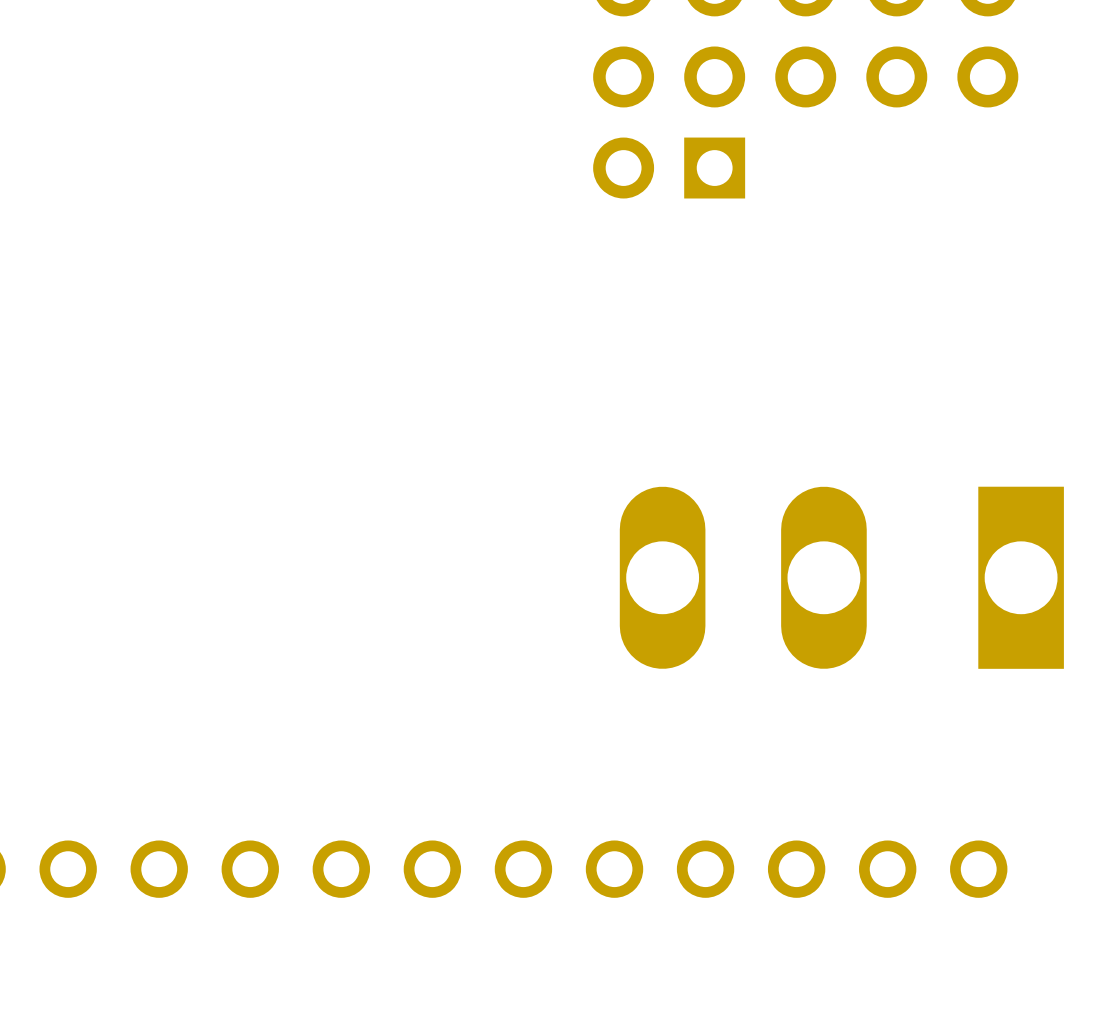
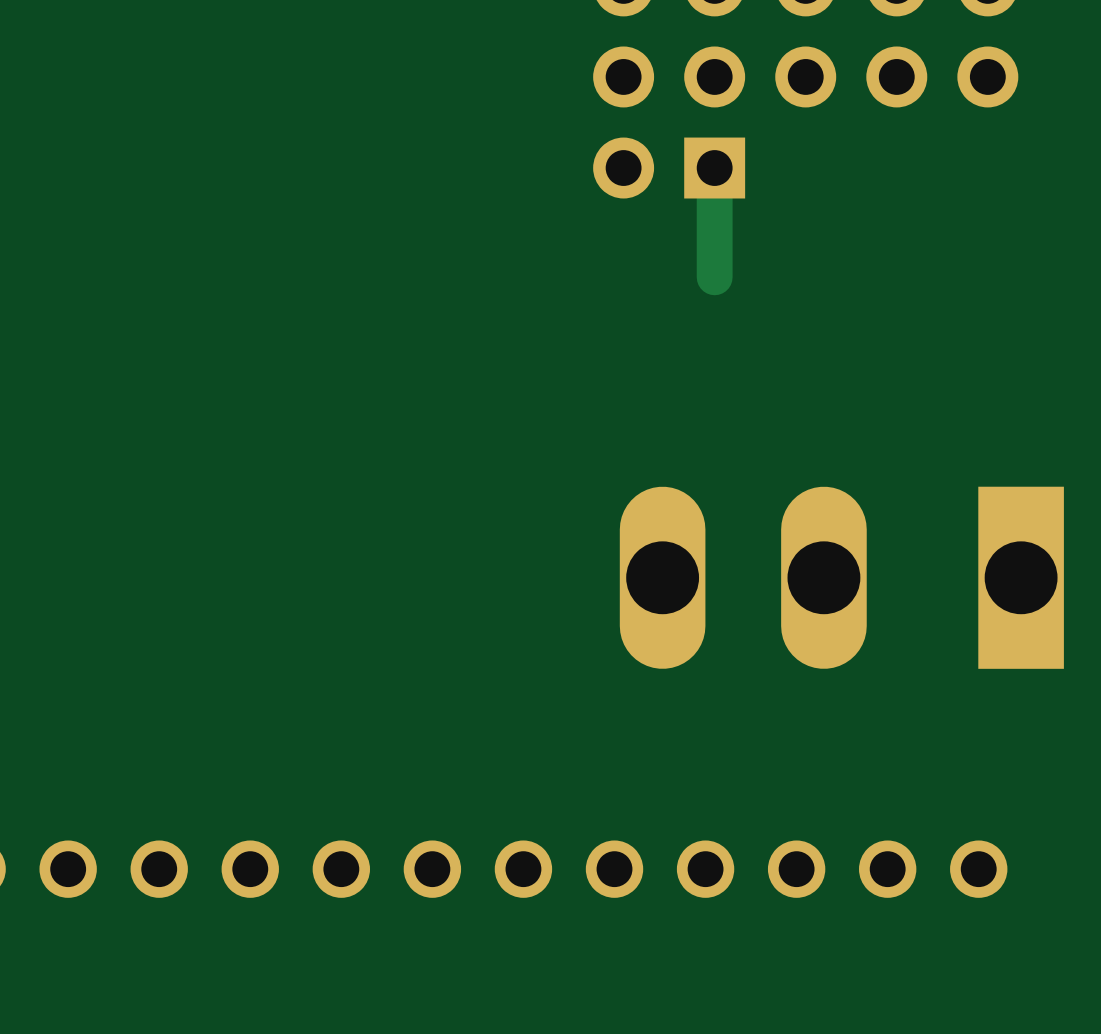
track: none -> (714, 168) (714, 277)

